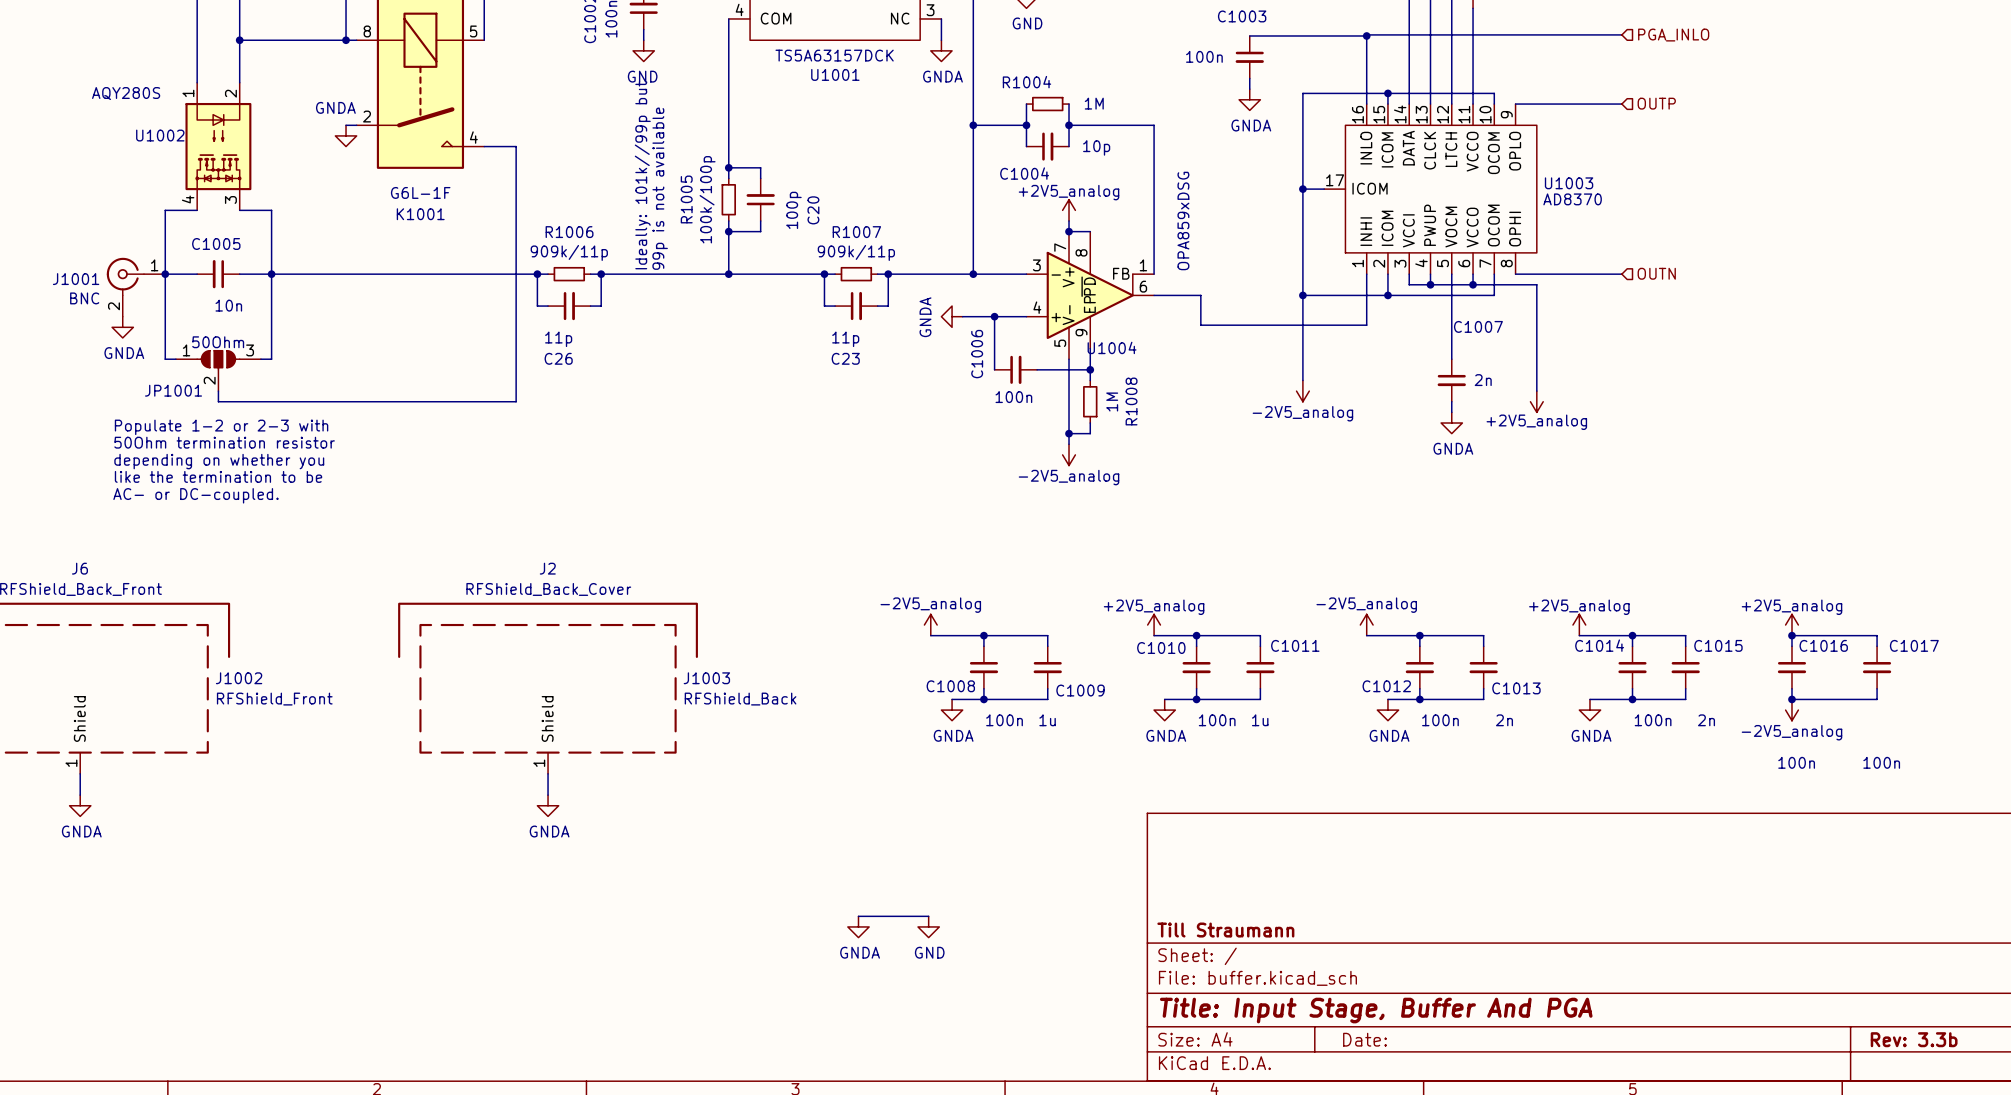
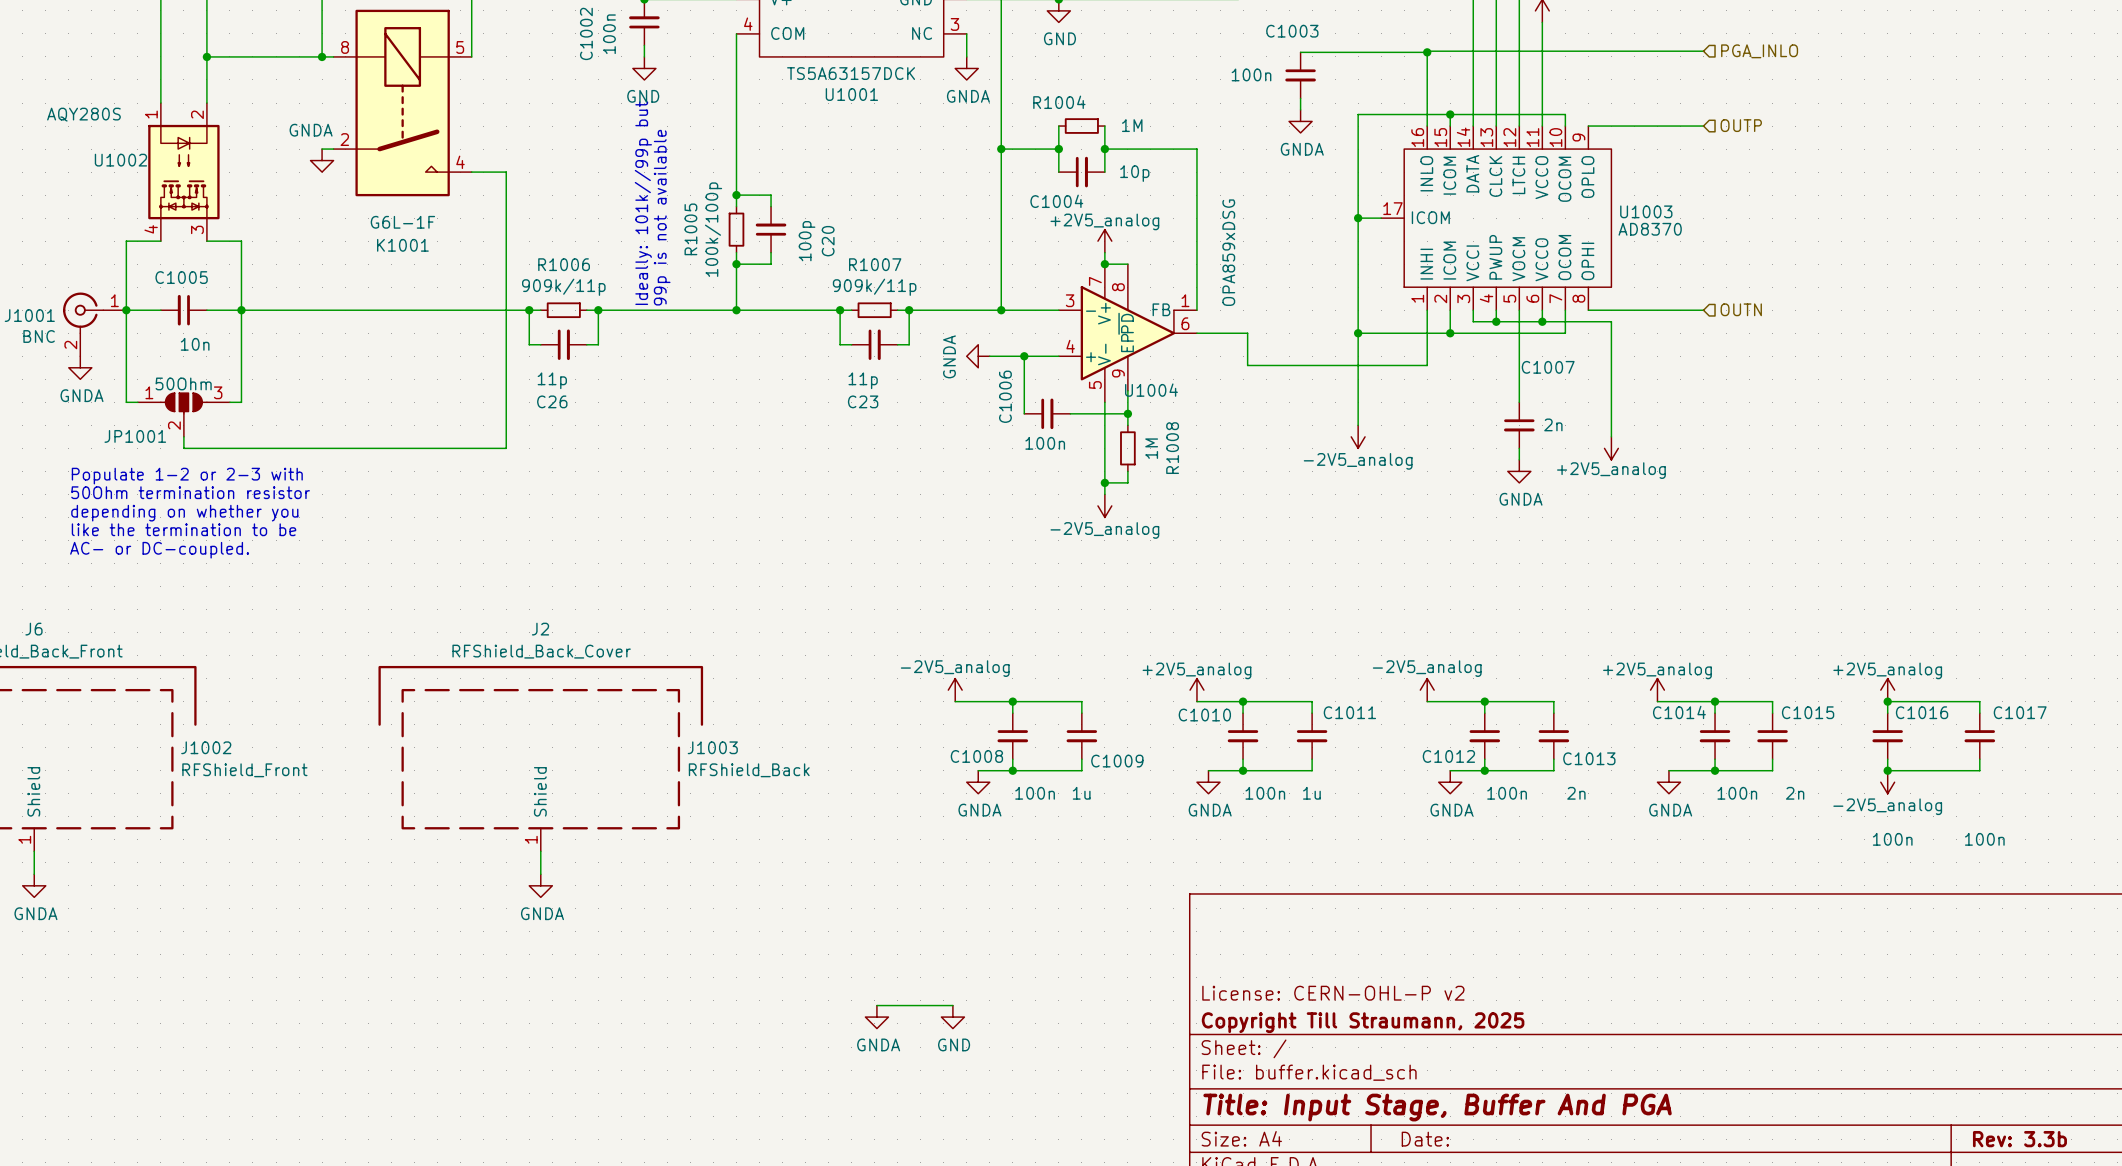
title block: none -> License: CERN-OHL-P v2 (1333, 993)
title block: Till Straumann (1225, 930) -> Copyright Till Straumann, 2025 (1363, 1022)

